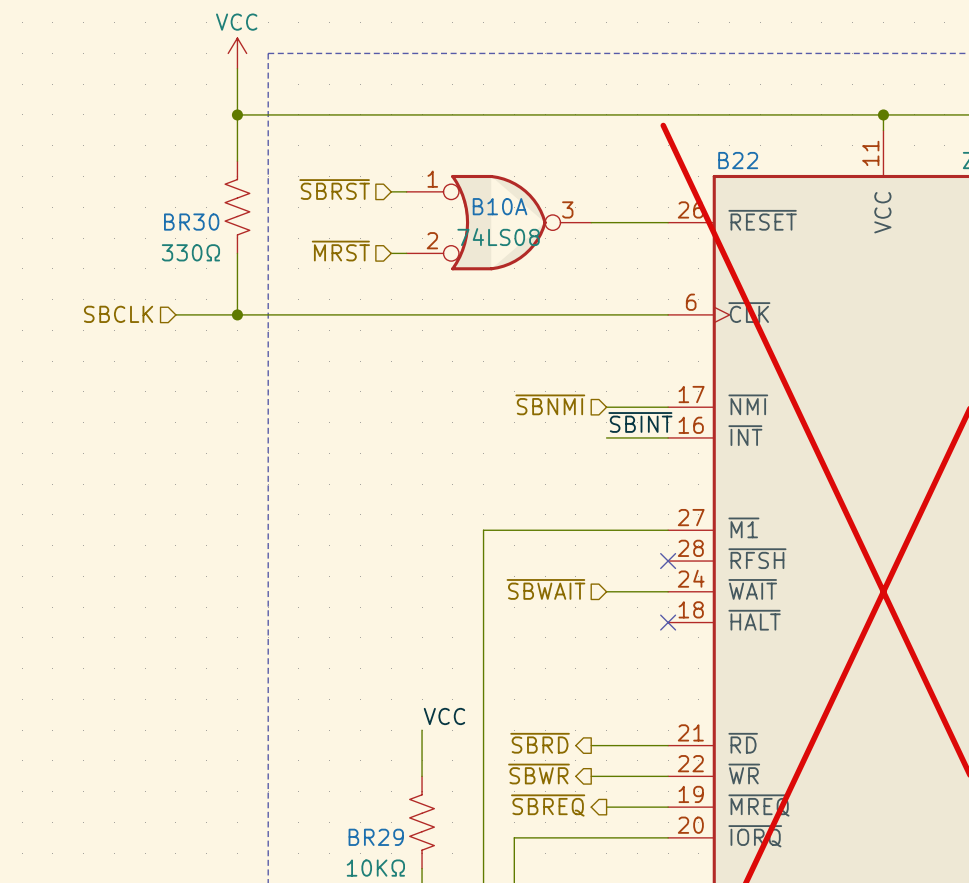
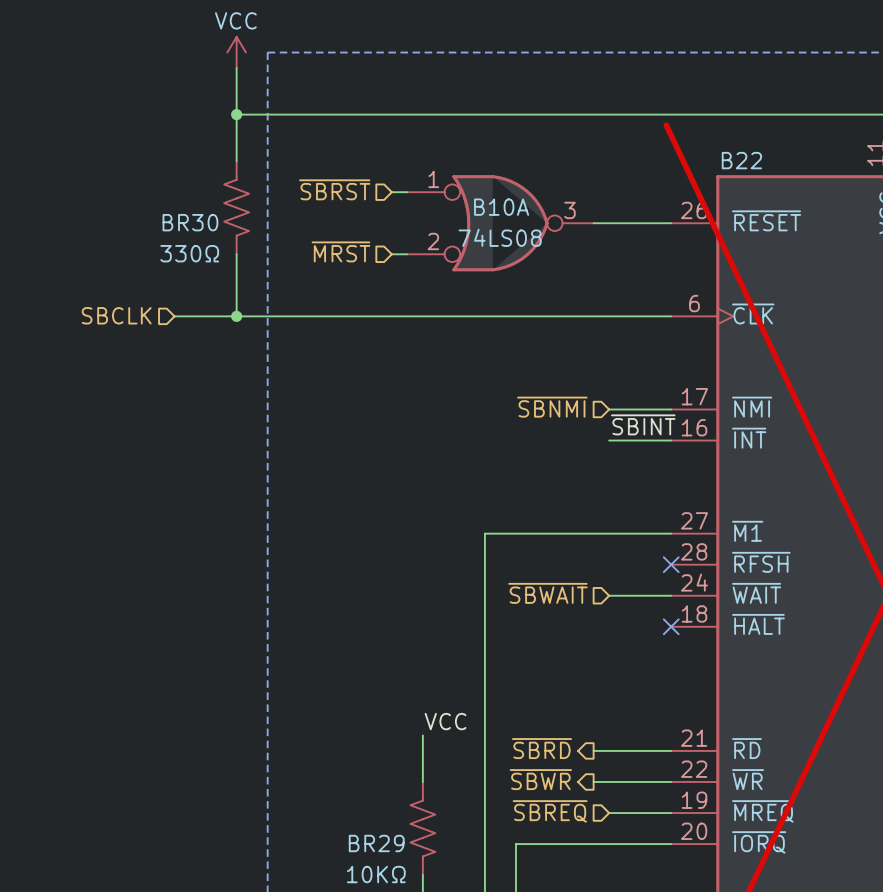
hierarchical label shape: output (548, 805) -> input (550, 811)

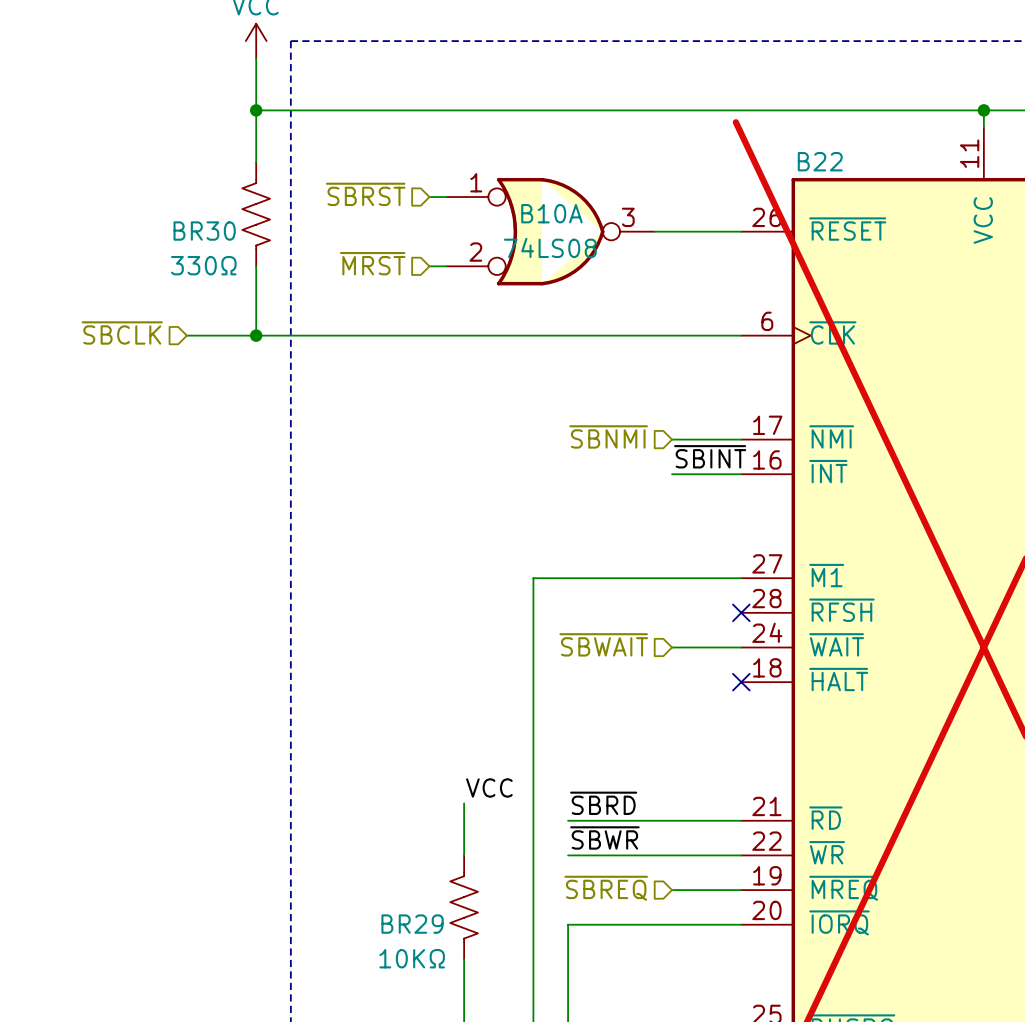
hierarchical label: SBCLK (116, 315) -> ~{SBCLK} (122, 332)
label: none -> ~{SBRD} (603, 803)
hierarchical label: ~{SBRD} (542, 748) -> none
wire: none -> (568, 820) (654, 820)
label: none -> ~{SBWR} (604, 837)
hierarchical label: ~{SBWR} (540, 779) -> none
wire: none -> (568, 855) (654, 855)

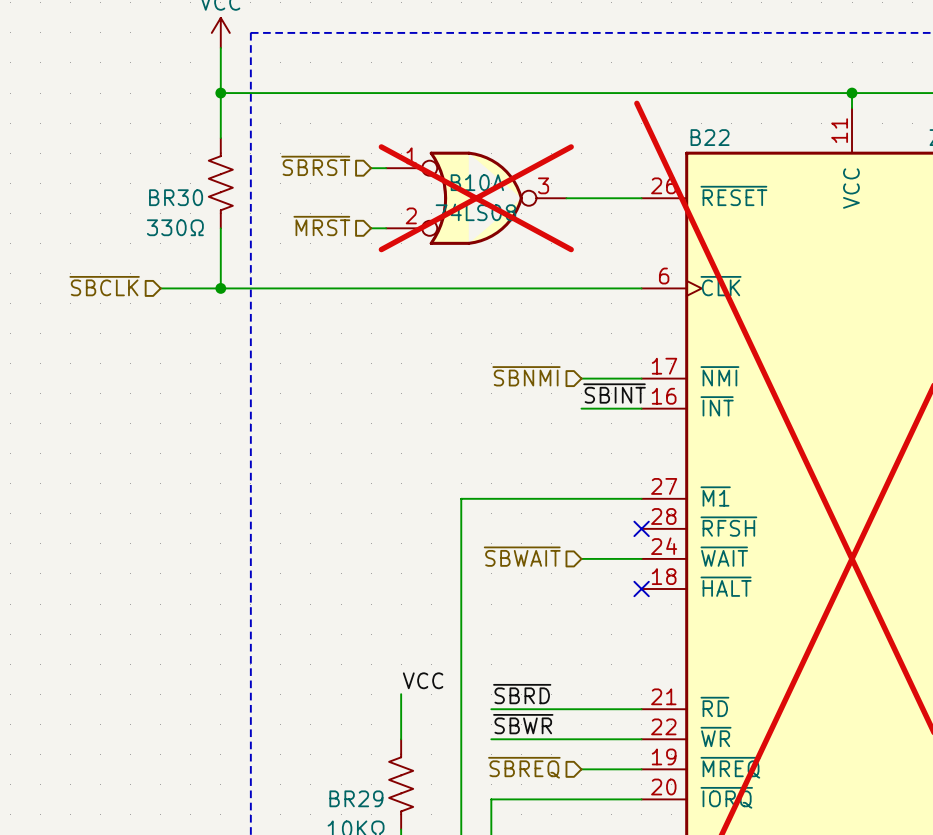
B10A do-not-place cross: none -> (476, 198)

